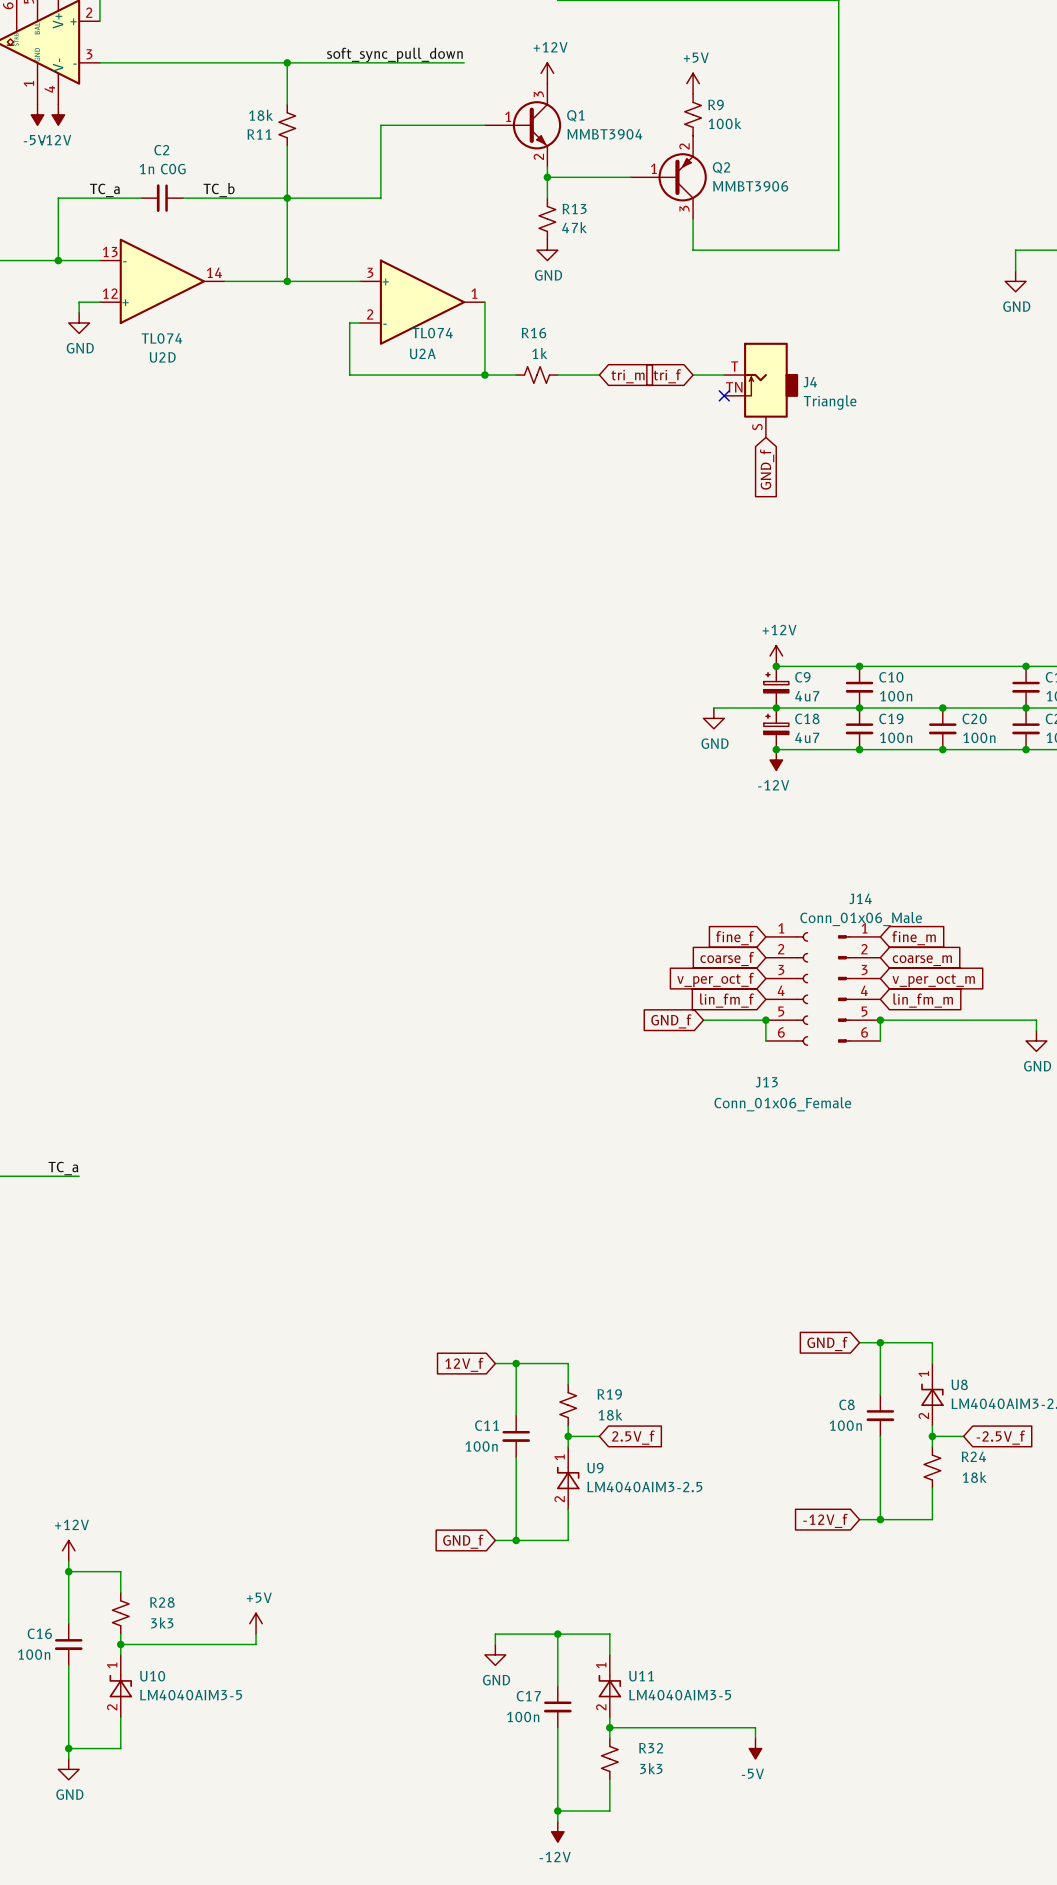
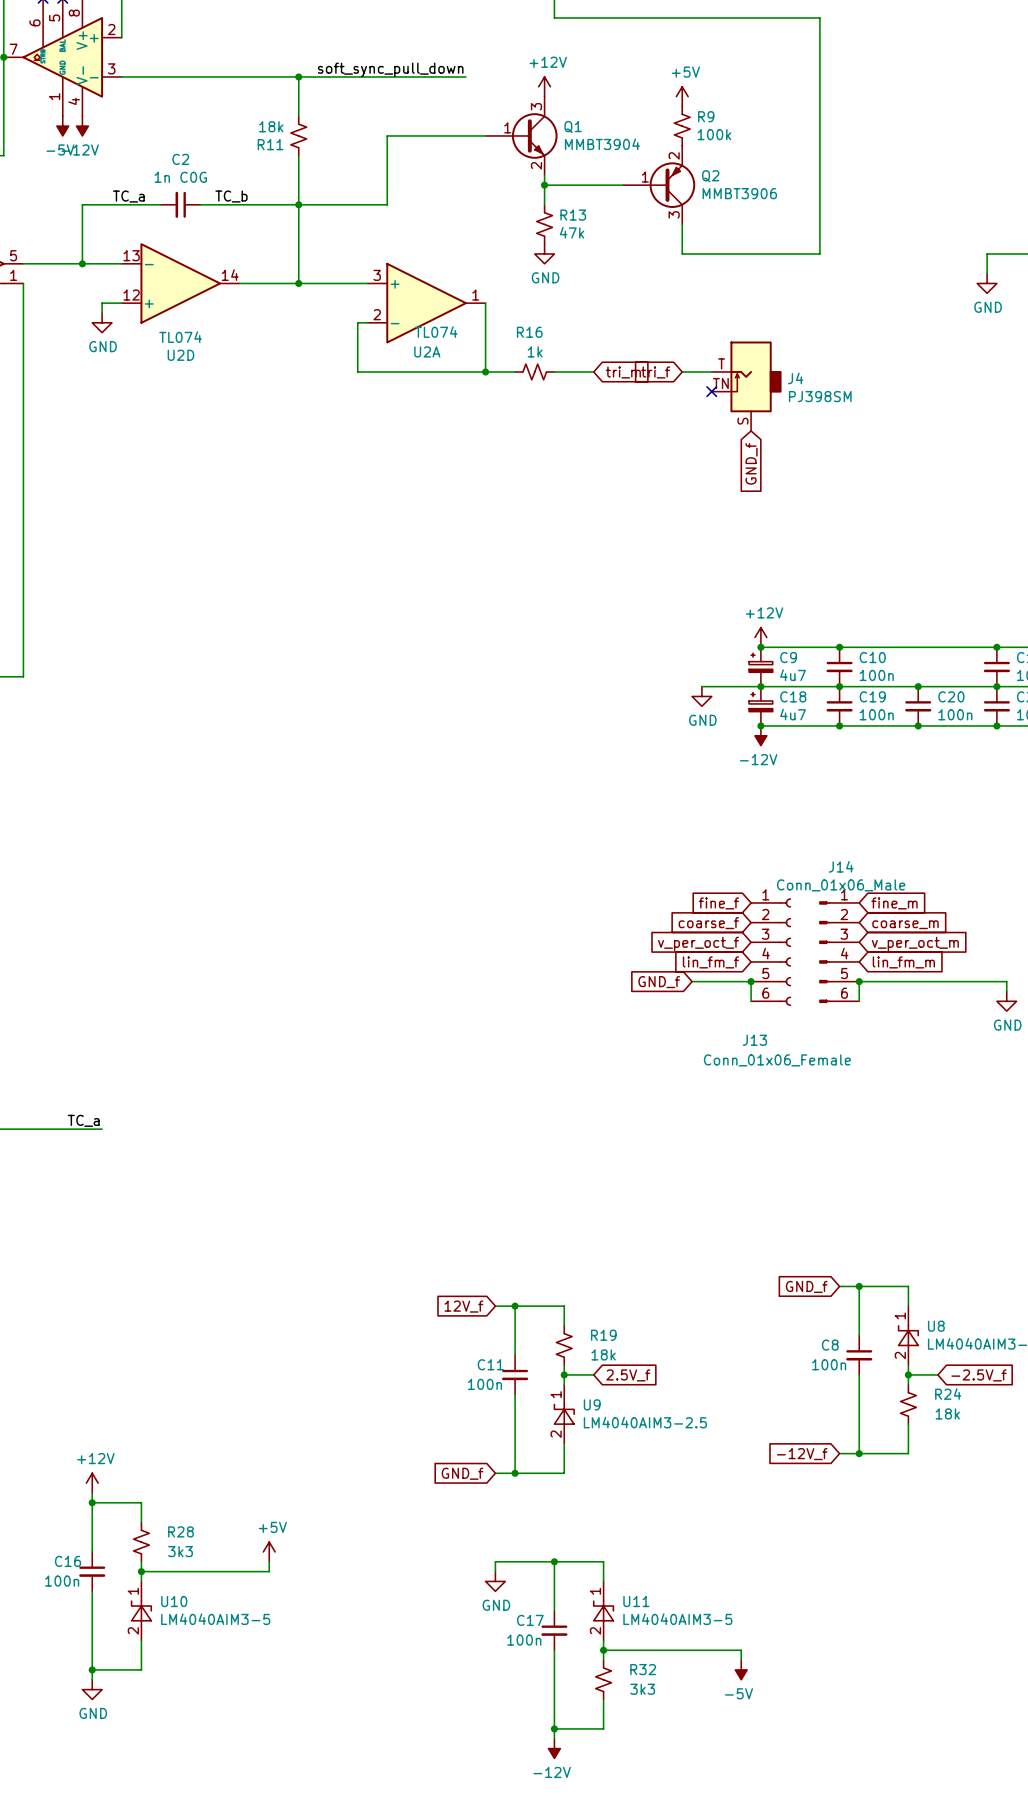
J4 value: Triangle (830, 402) -> PJ398SM (820, 396)

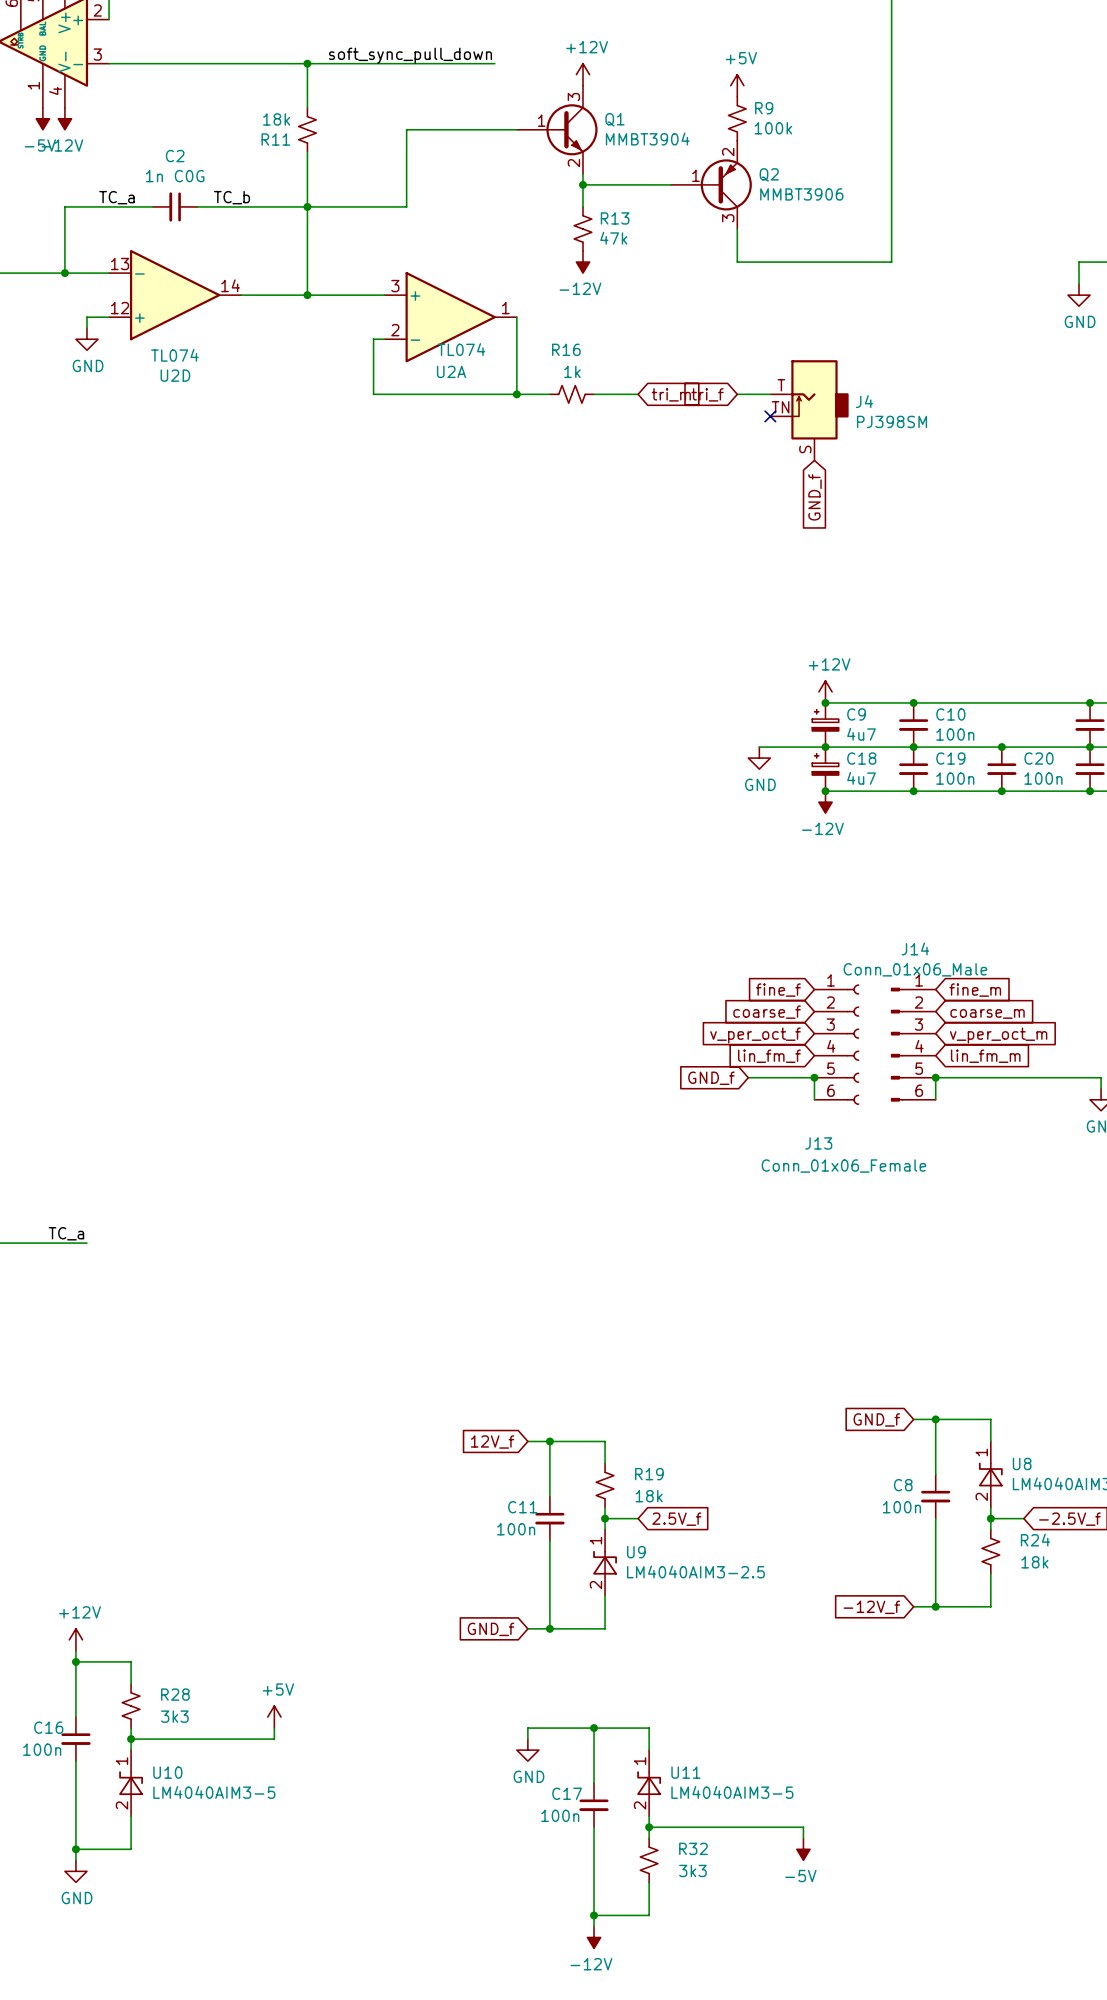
power symbol: GND (544, 253) -> -12V (582, 262)

